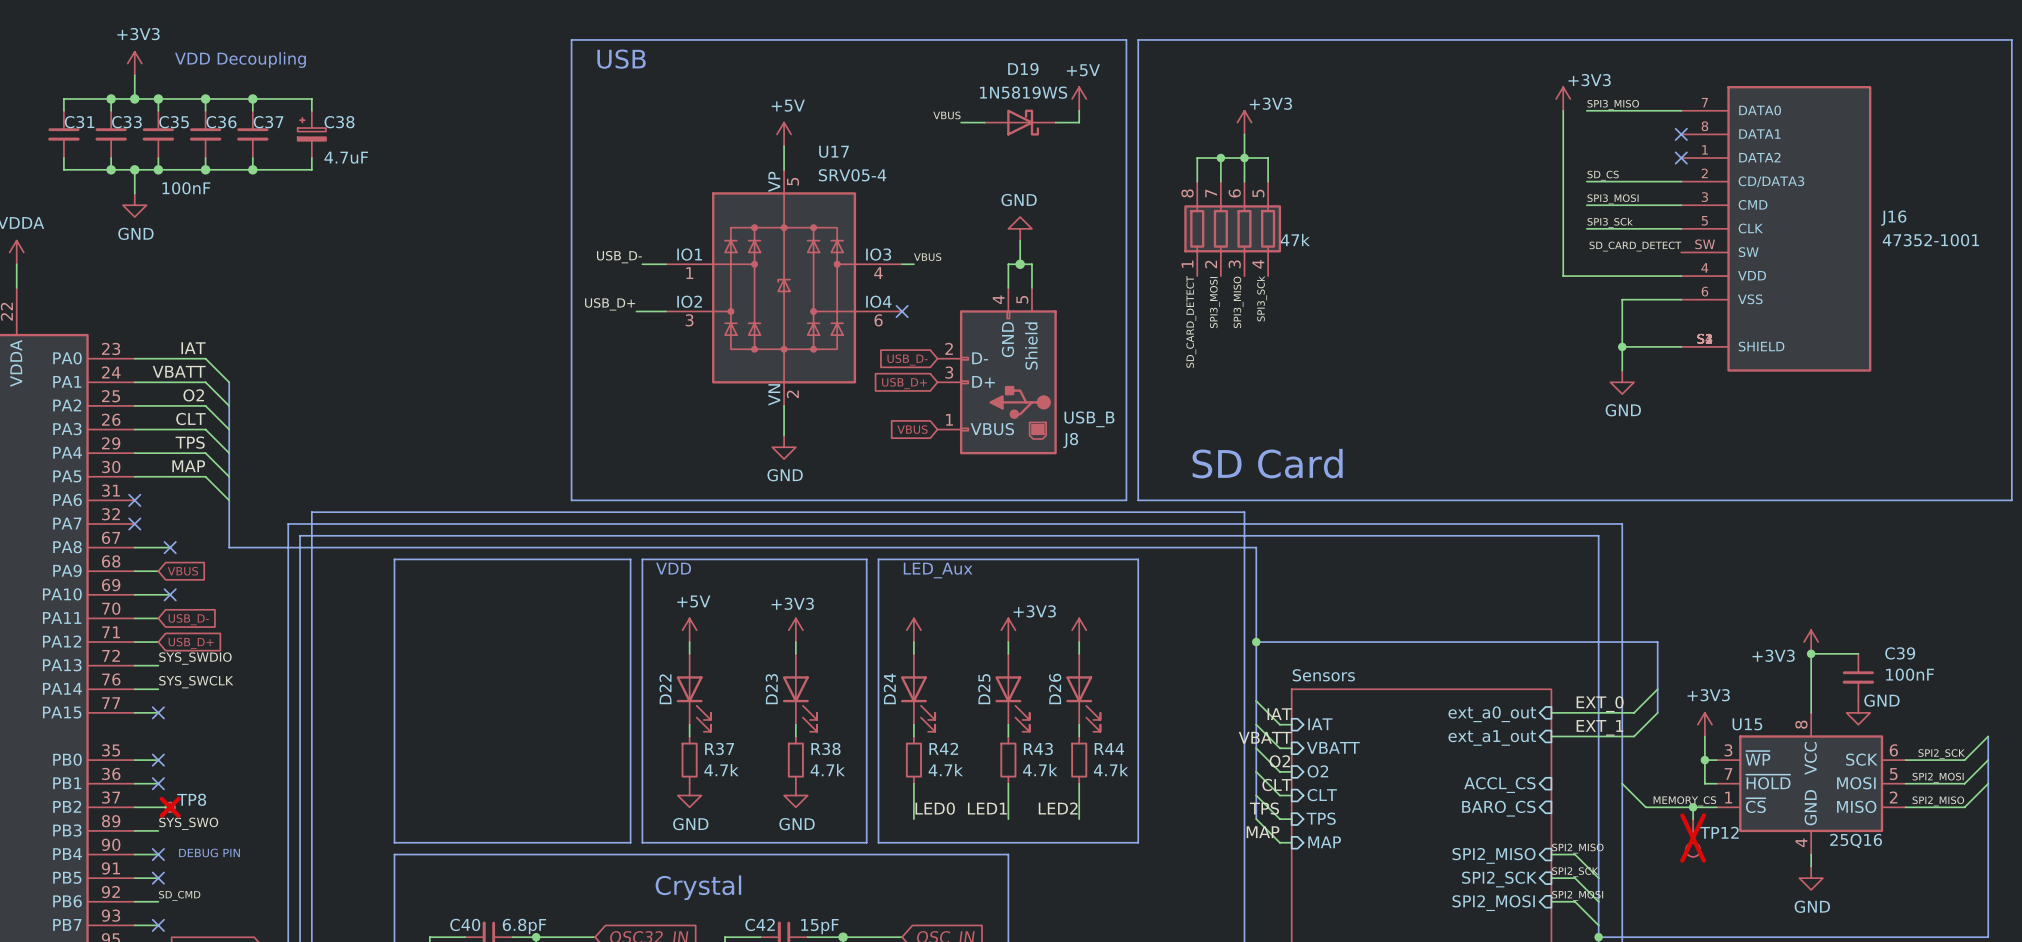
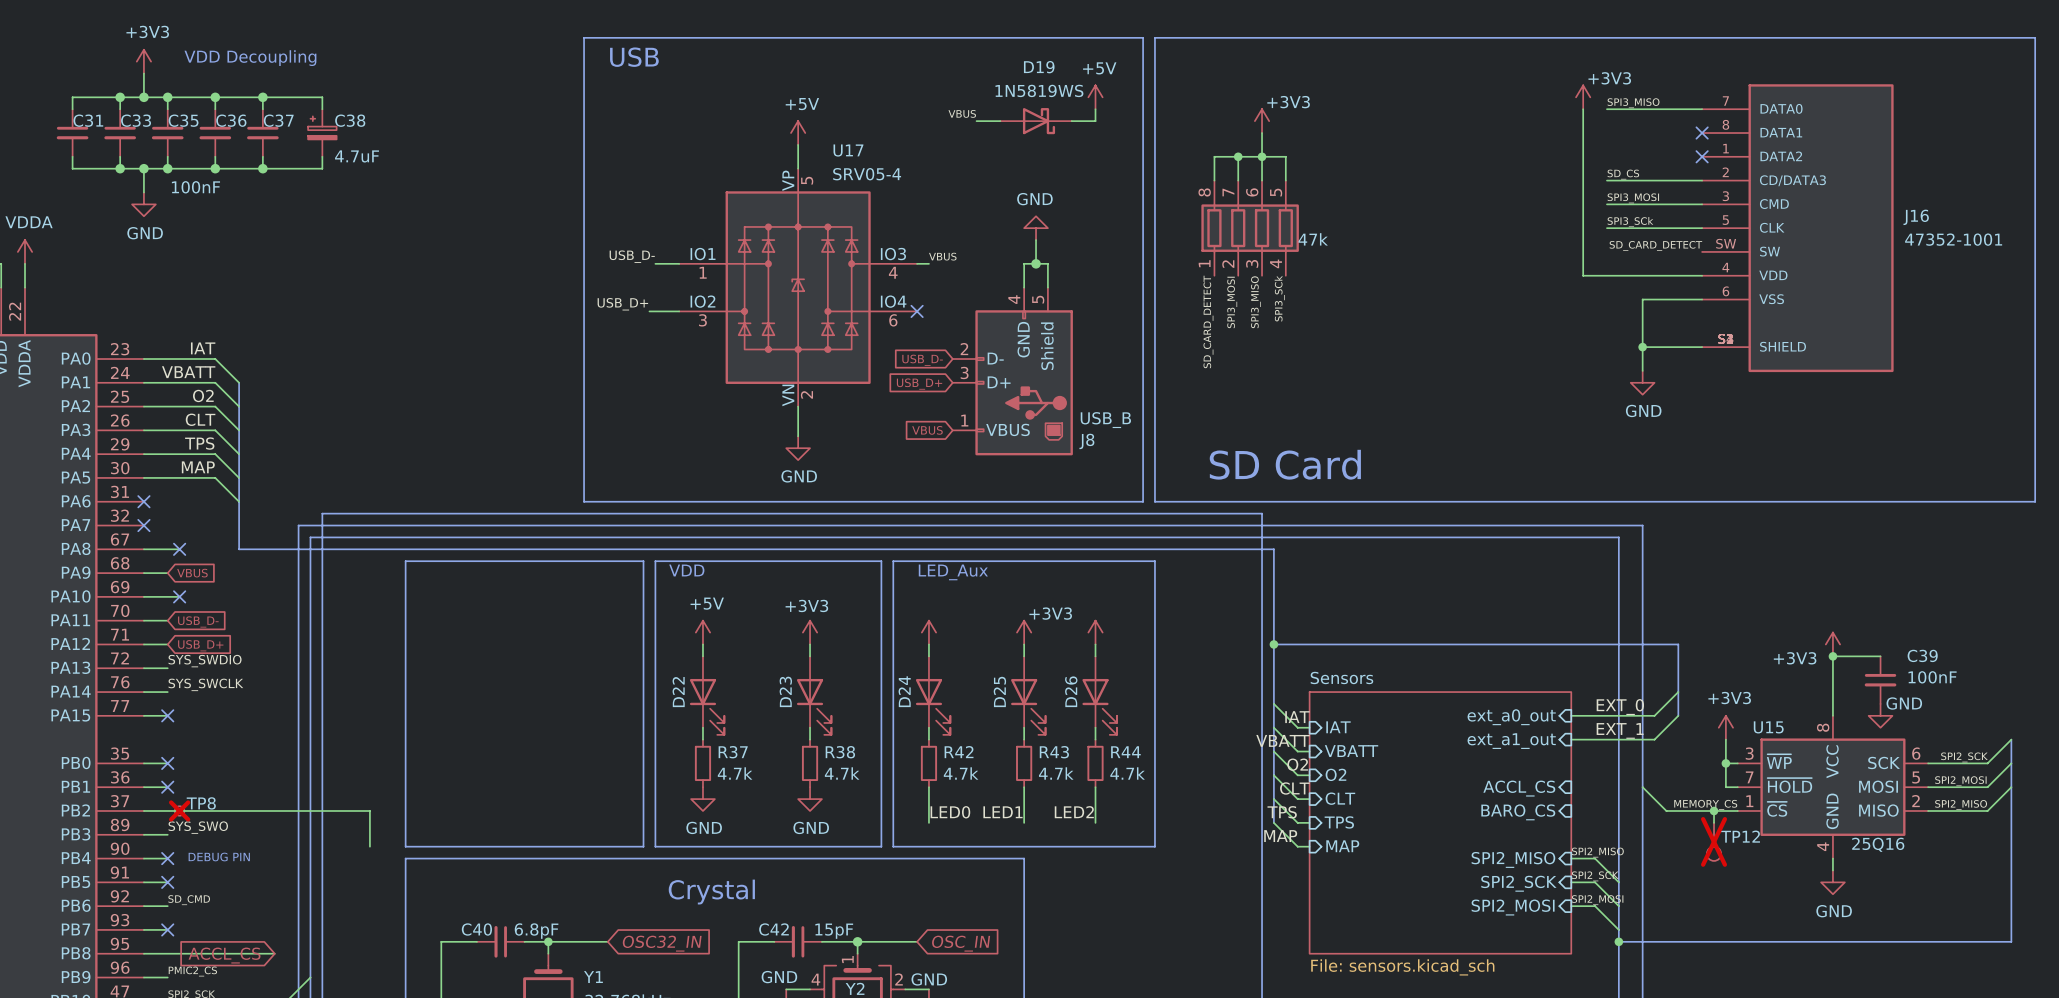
wire: none -> (179, 810) (369, 810) (369, 846)

